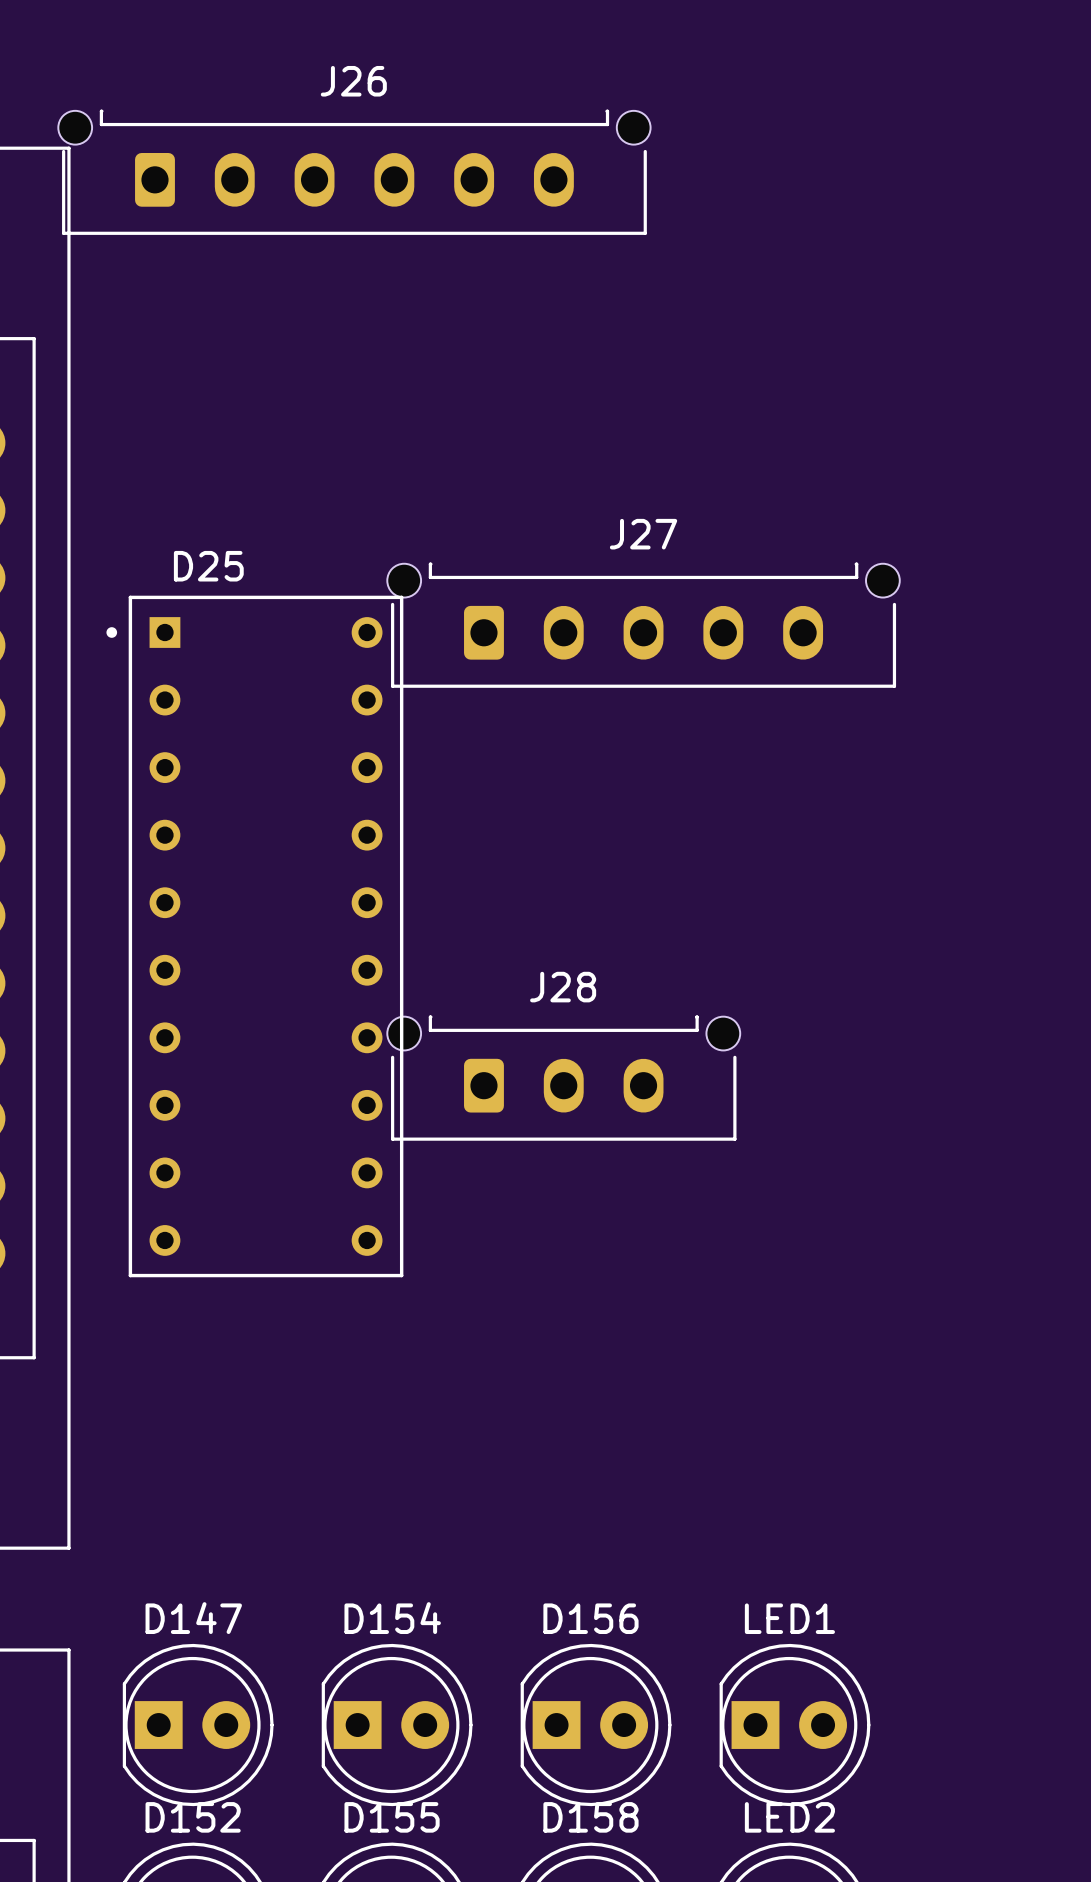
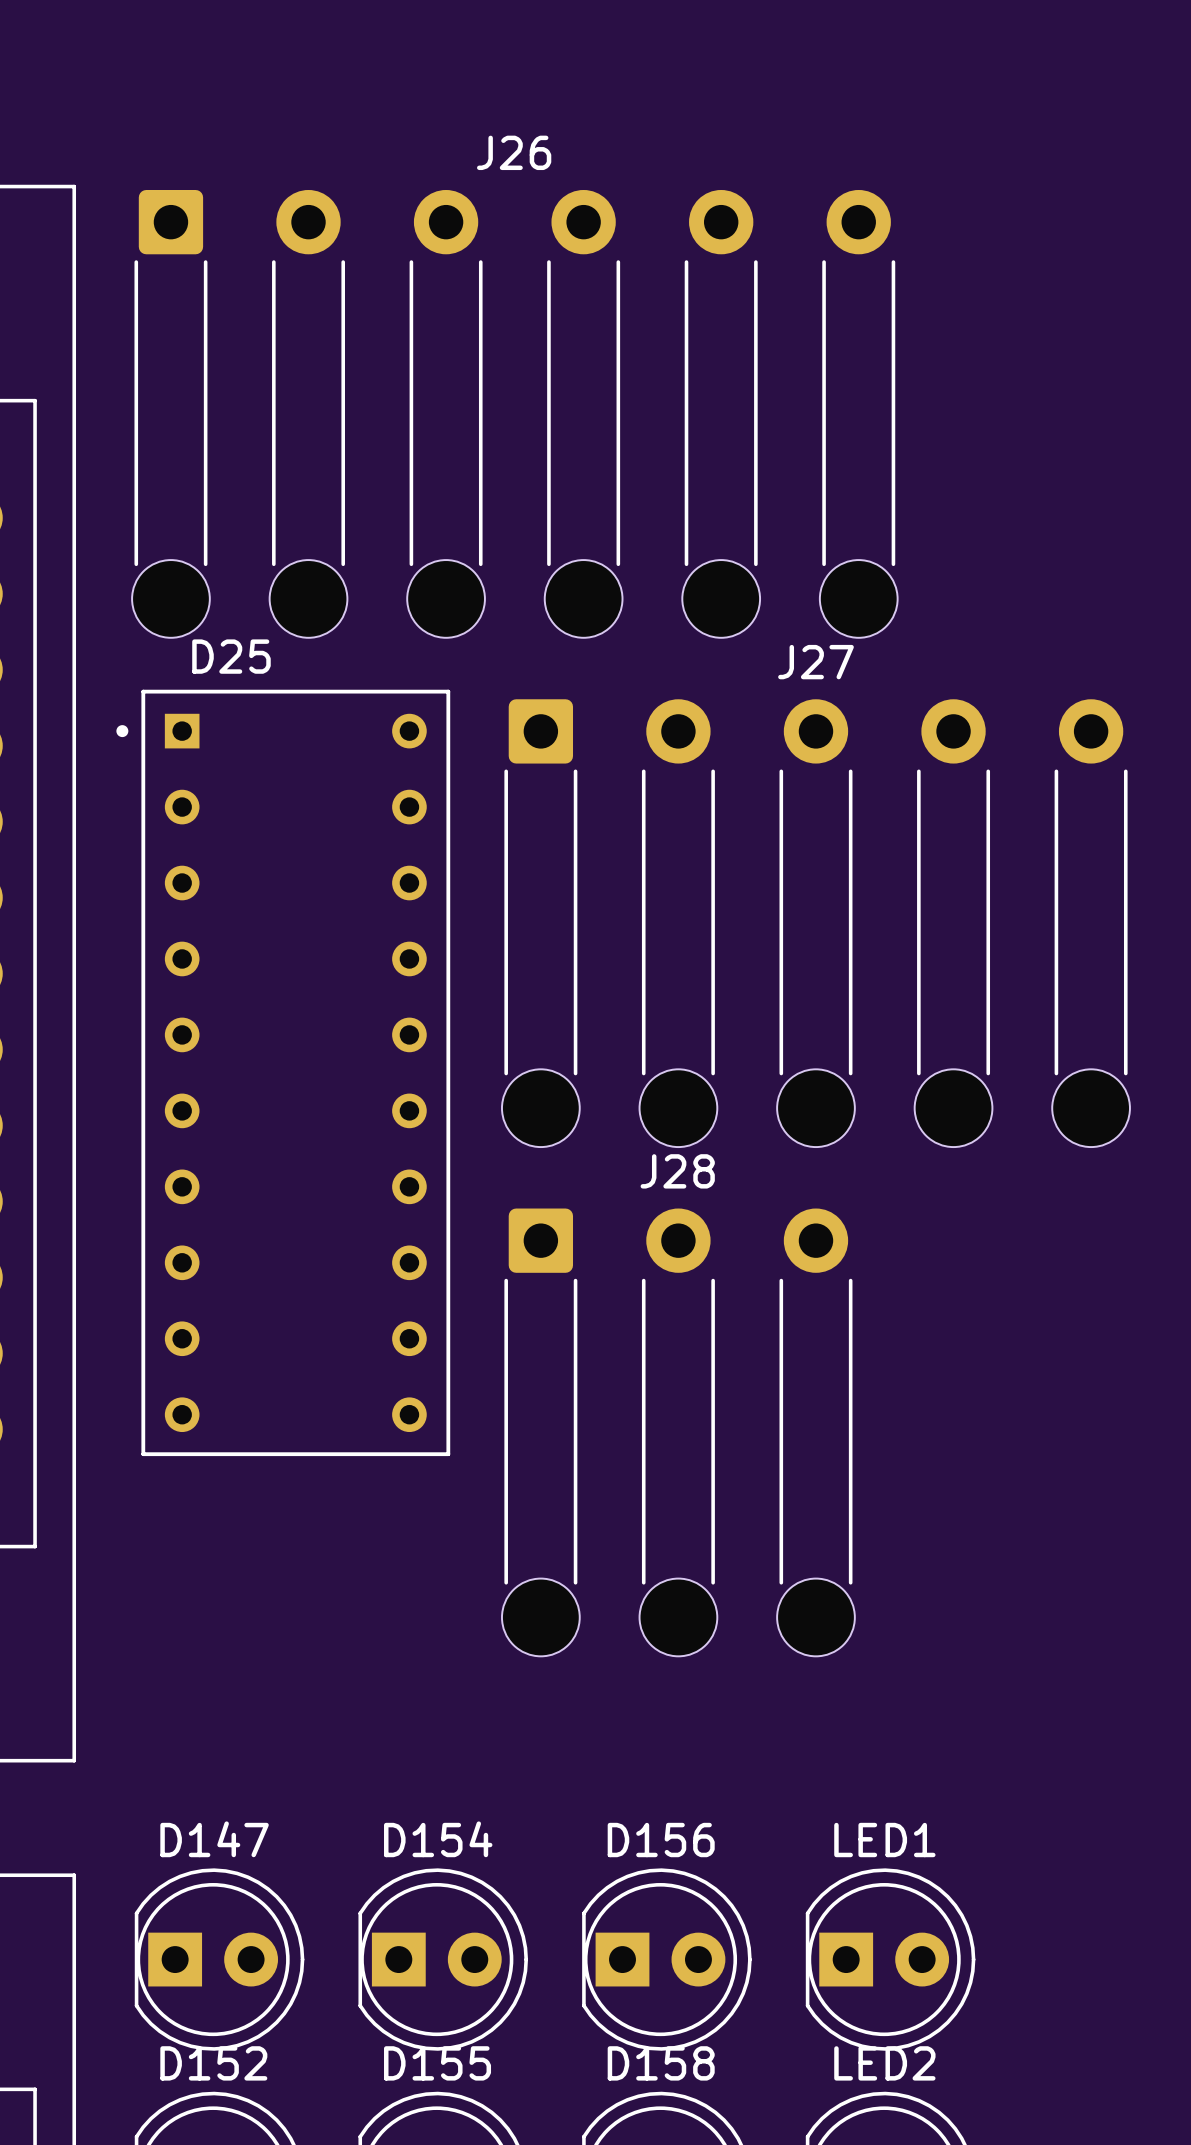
J26 name position: J26 (353, 81) -> J26 (514, 152)
J26 footprint: [58, 109, 651, 235] -> [132, 189, 898, 638]
J27 name position: J27 (643, 534) -> J27 (815, 662)
J27 footprint: [387, 562, 900, 688] -> [501, 699, 1130, 1148]
J28 name position: J28 (563, 987) -> J28 (677, 1171)
J28 footprint: [387, 1015, 741, 1141] -> [501, 1208, 855, 1657]

